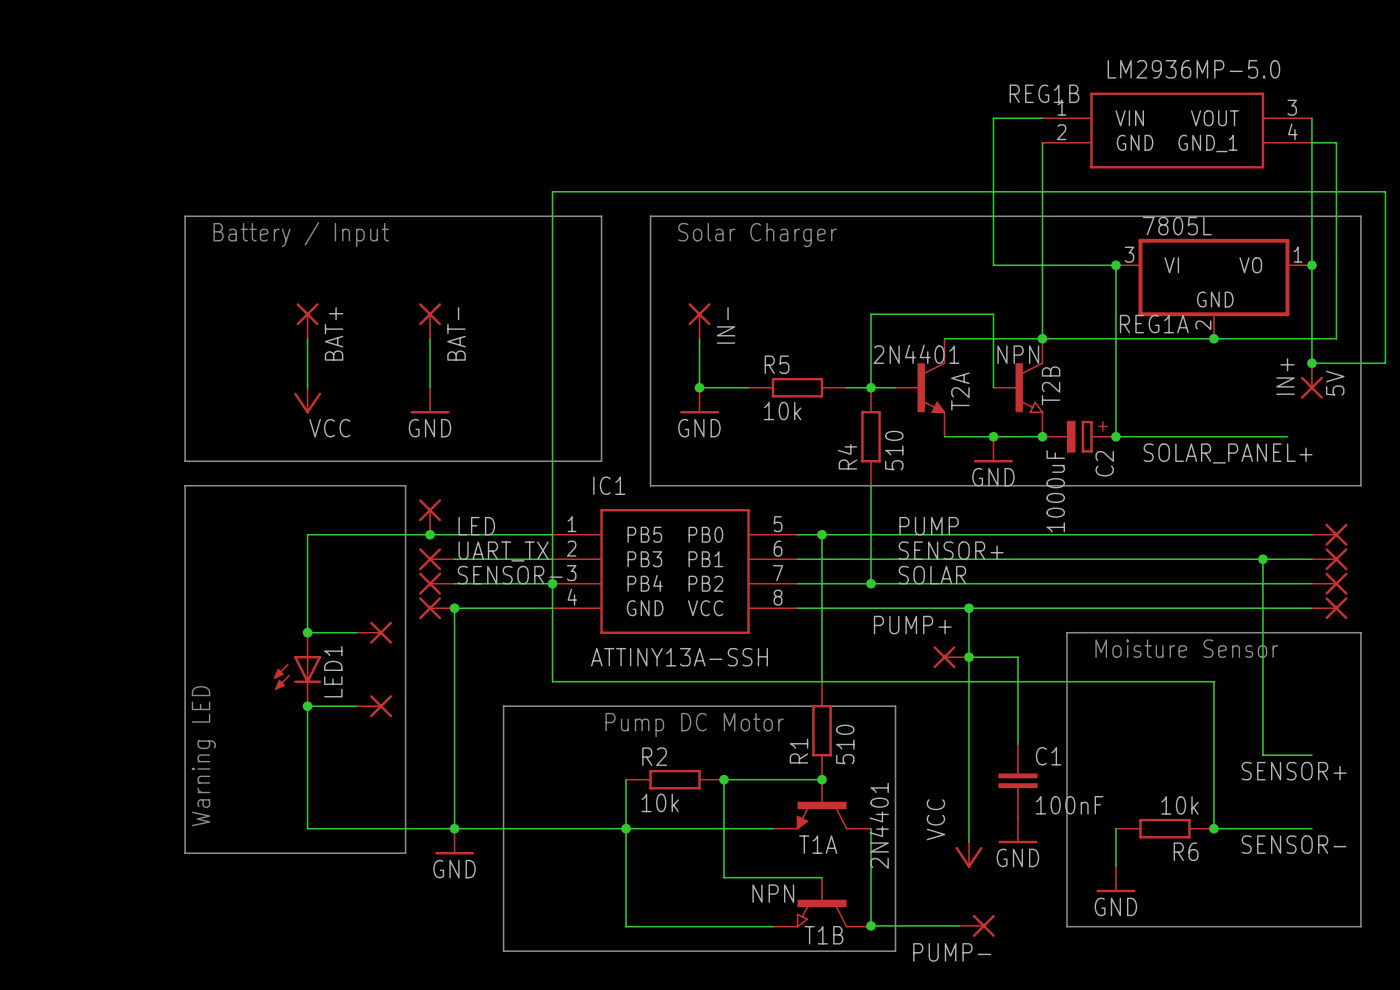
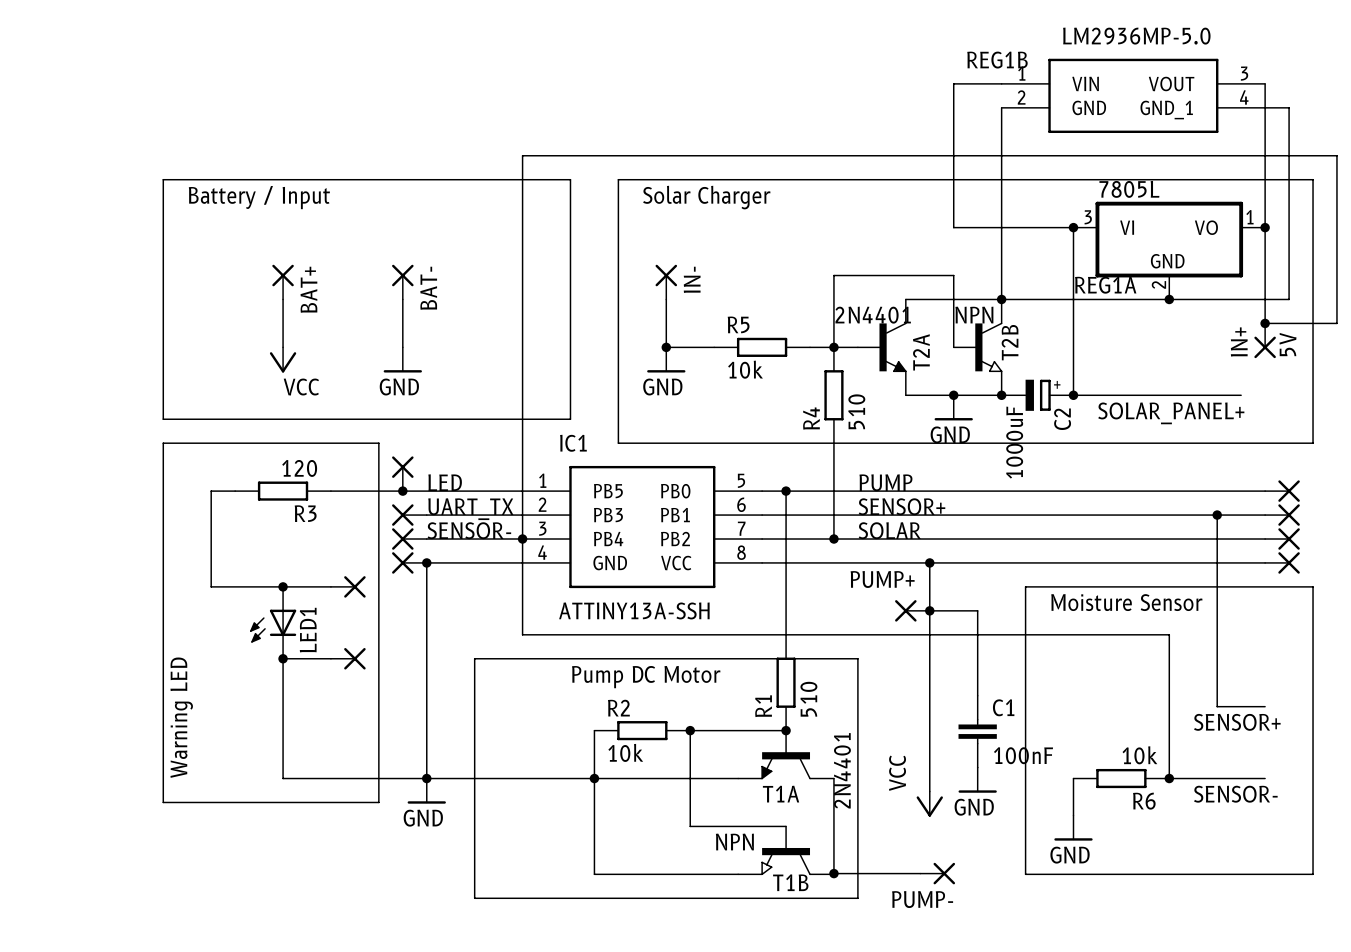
R3: none -> 120 (283, 491)
wire: (356, 534) (307, 534) (307, 632) -> (235, 491) (211, 491) (211, 586) (283, 586)

